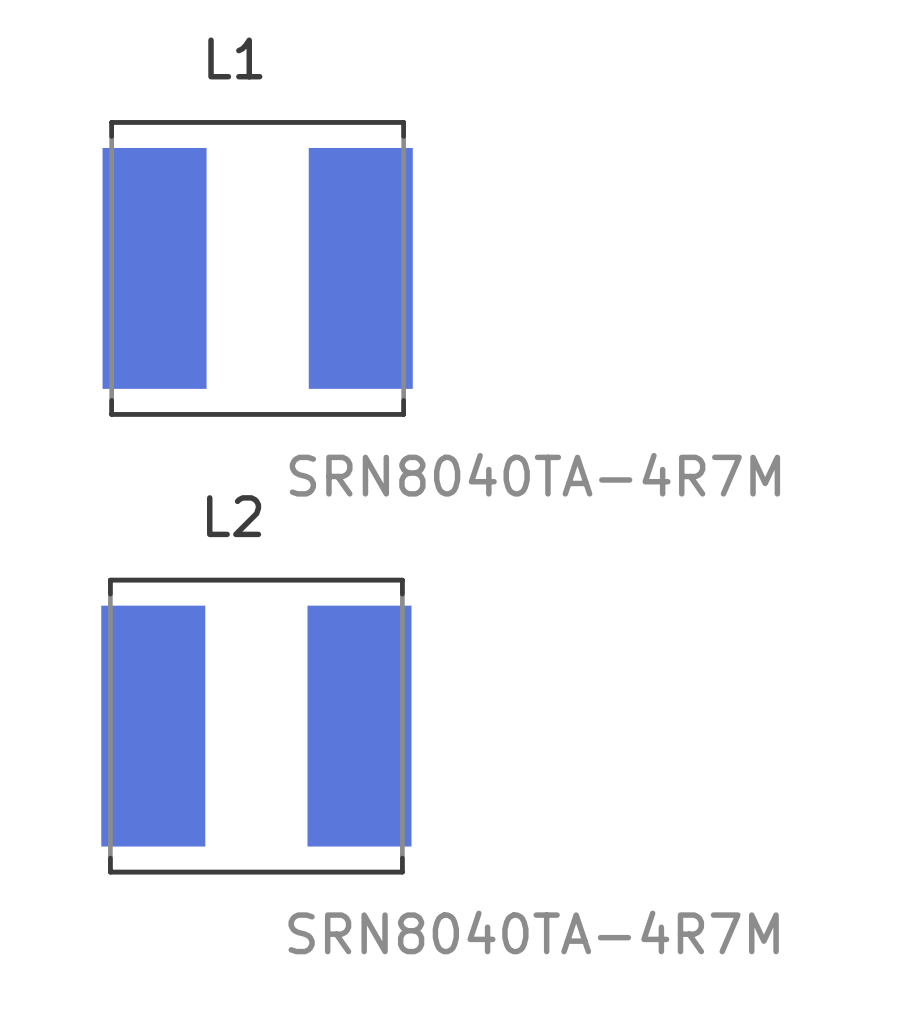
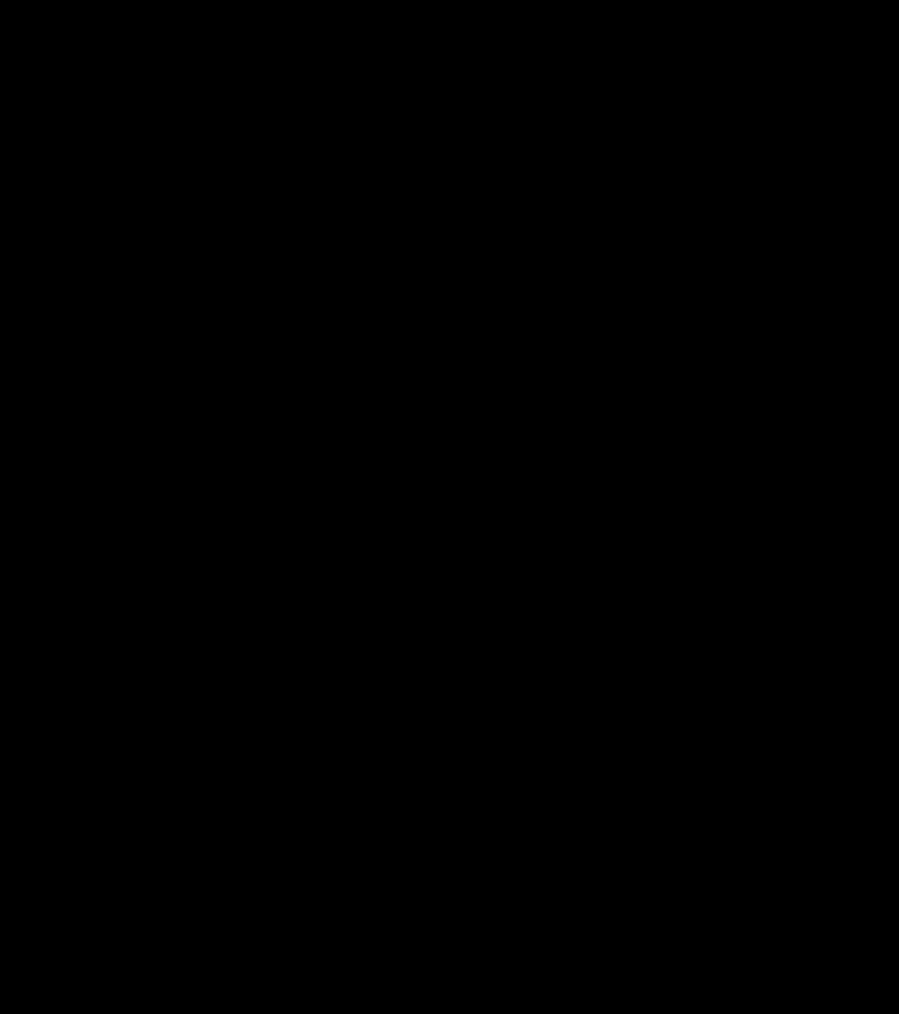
L1: SRN8040TA-4R7M (257, 268) -> none
L2: SRN8040TA-4R7M (256, 726) -> none

